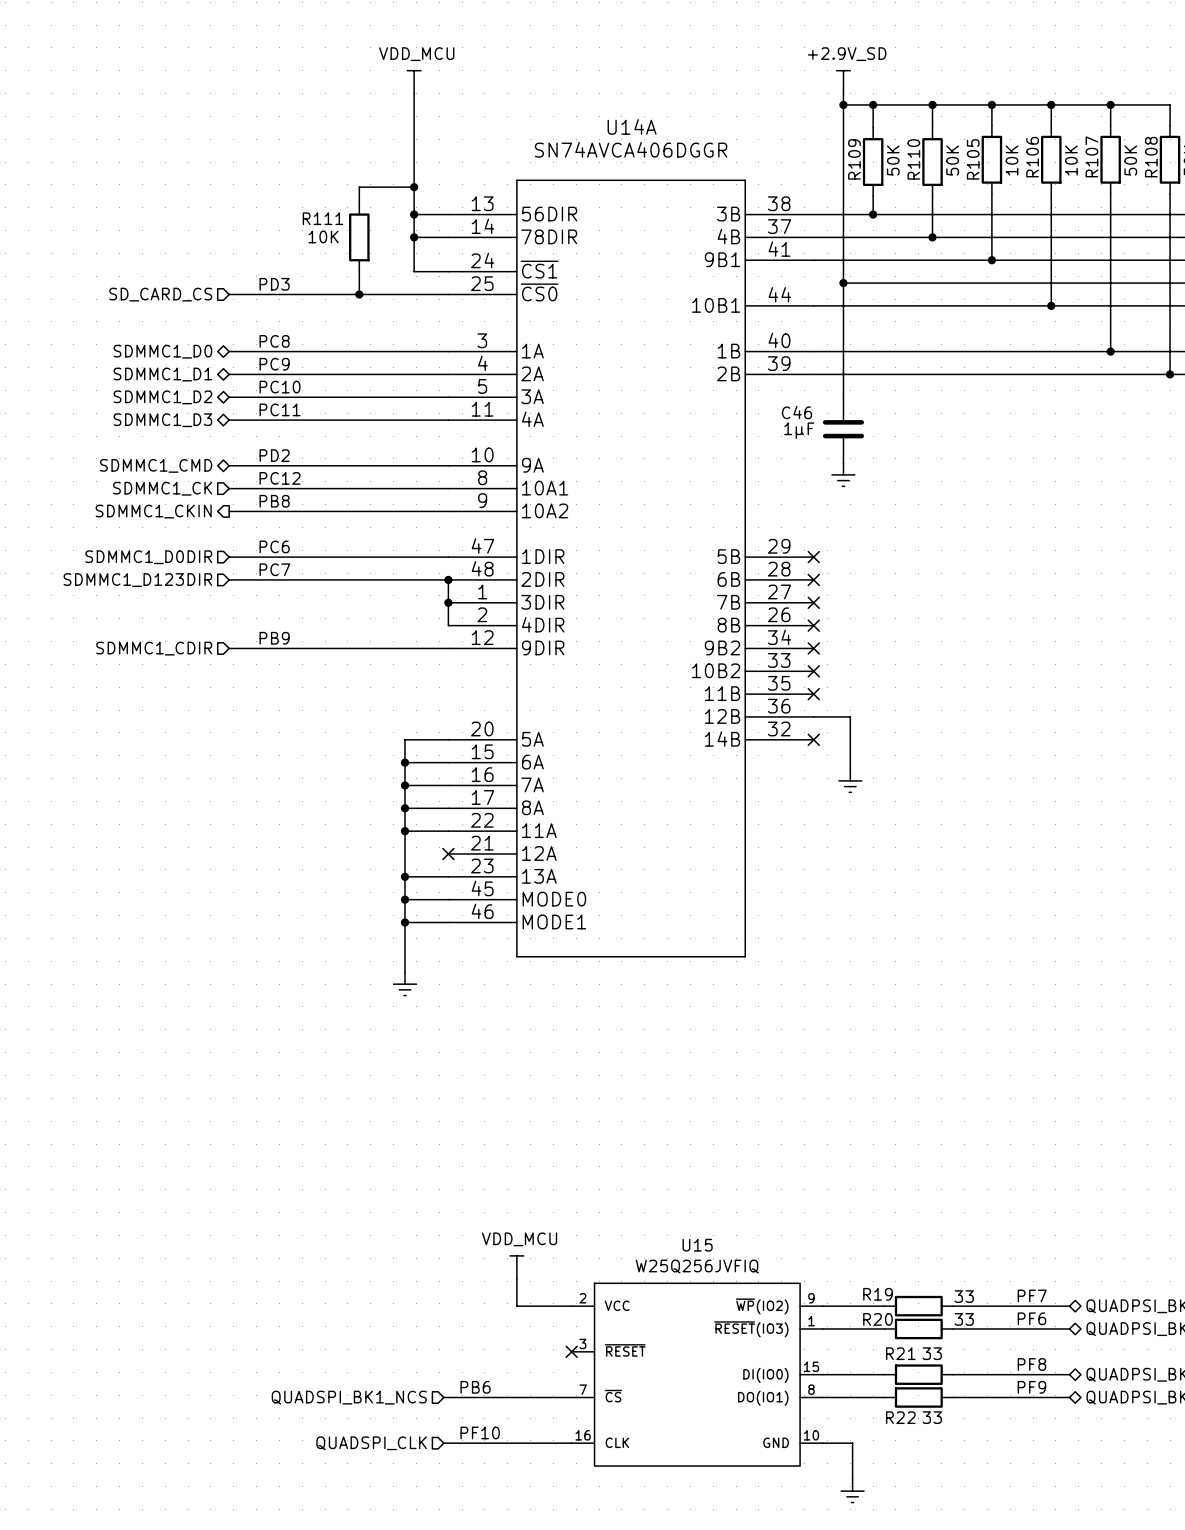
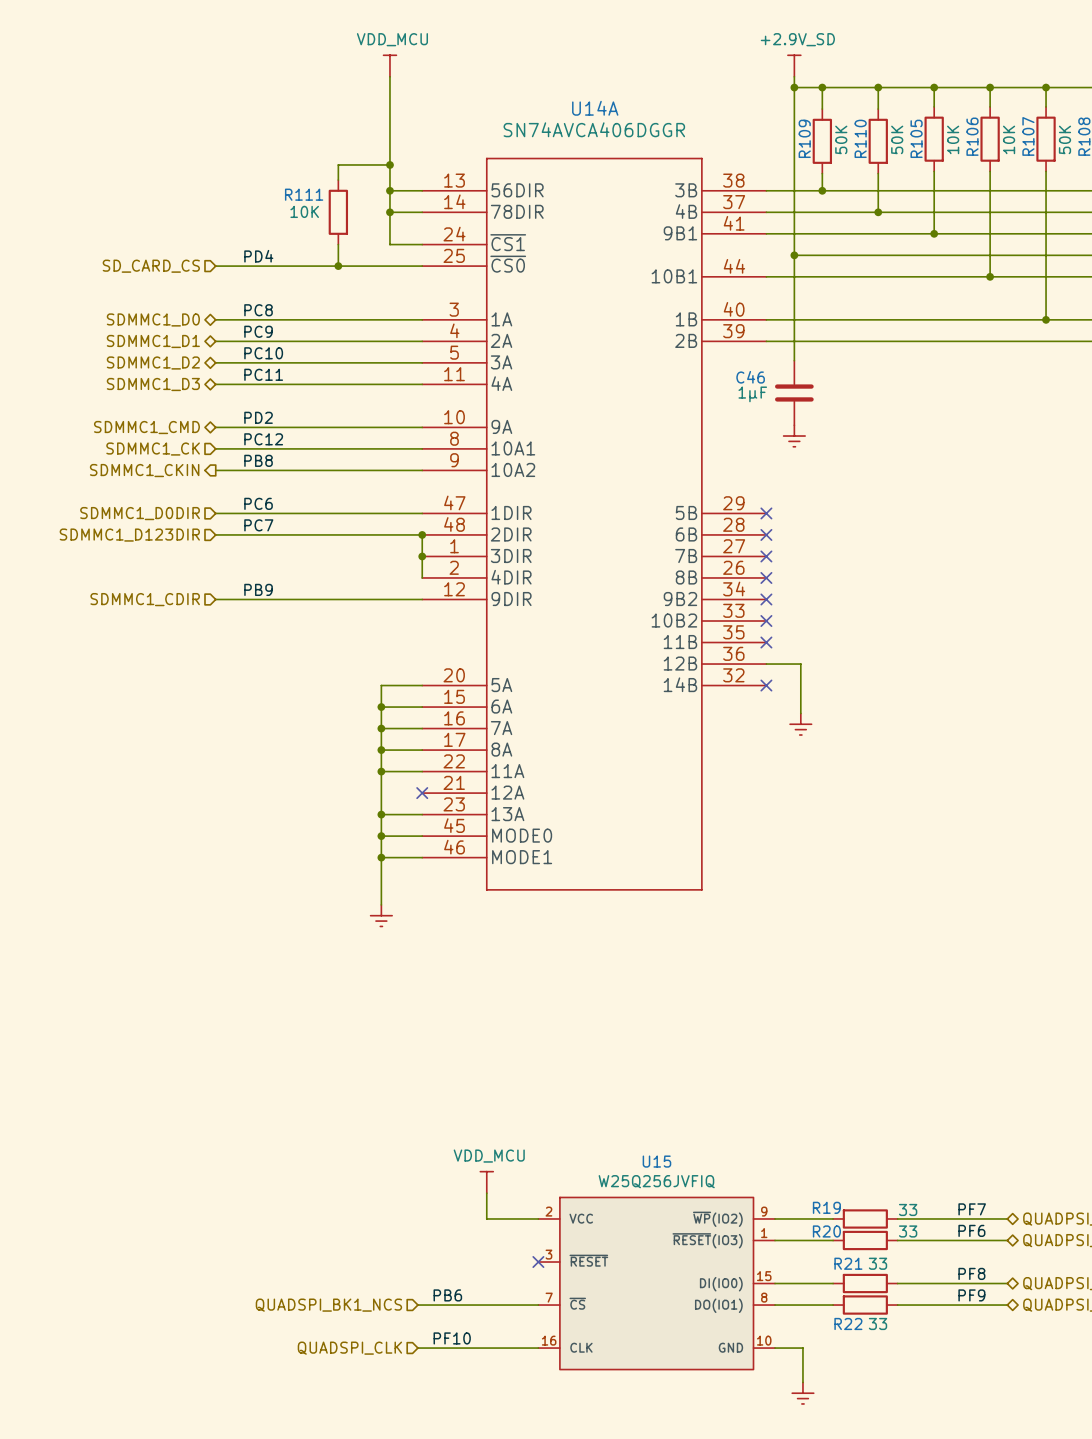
label: PD3 (274, 284) -> PD4 (258, 256)

